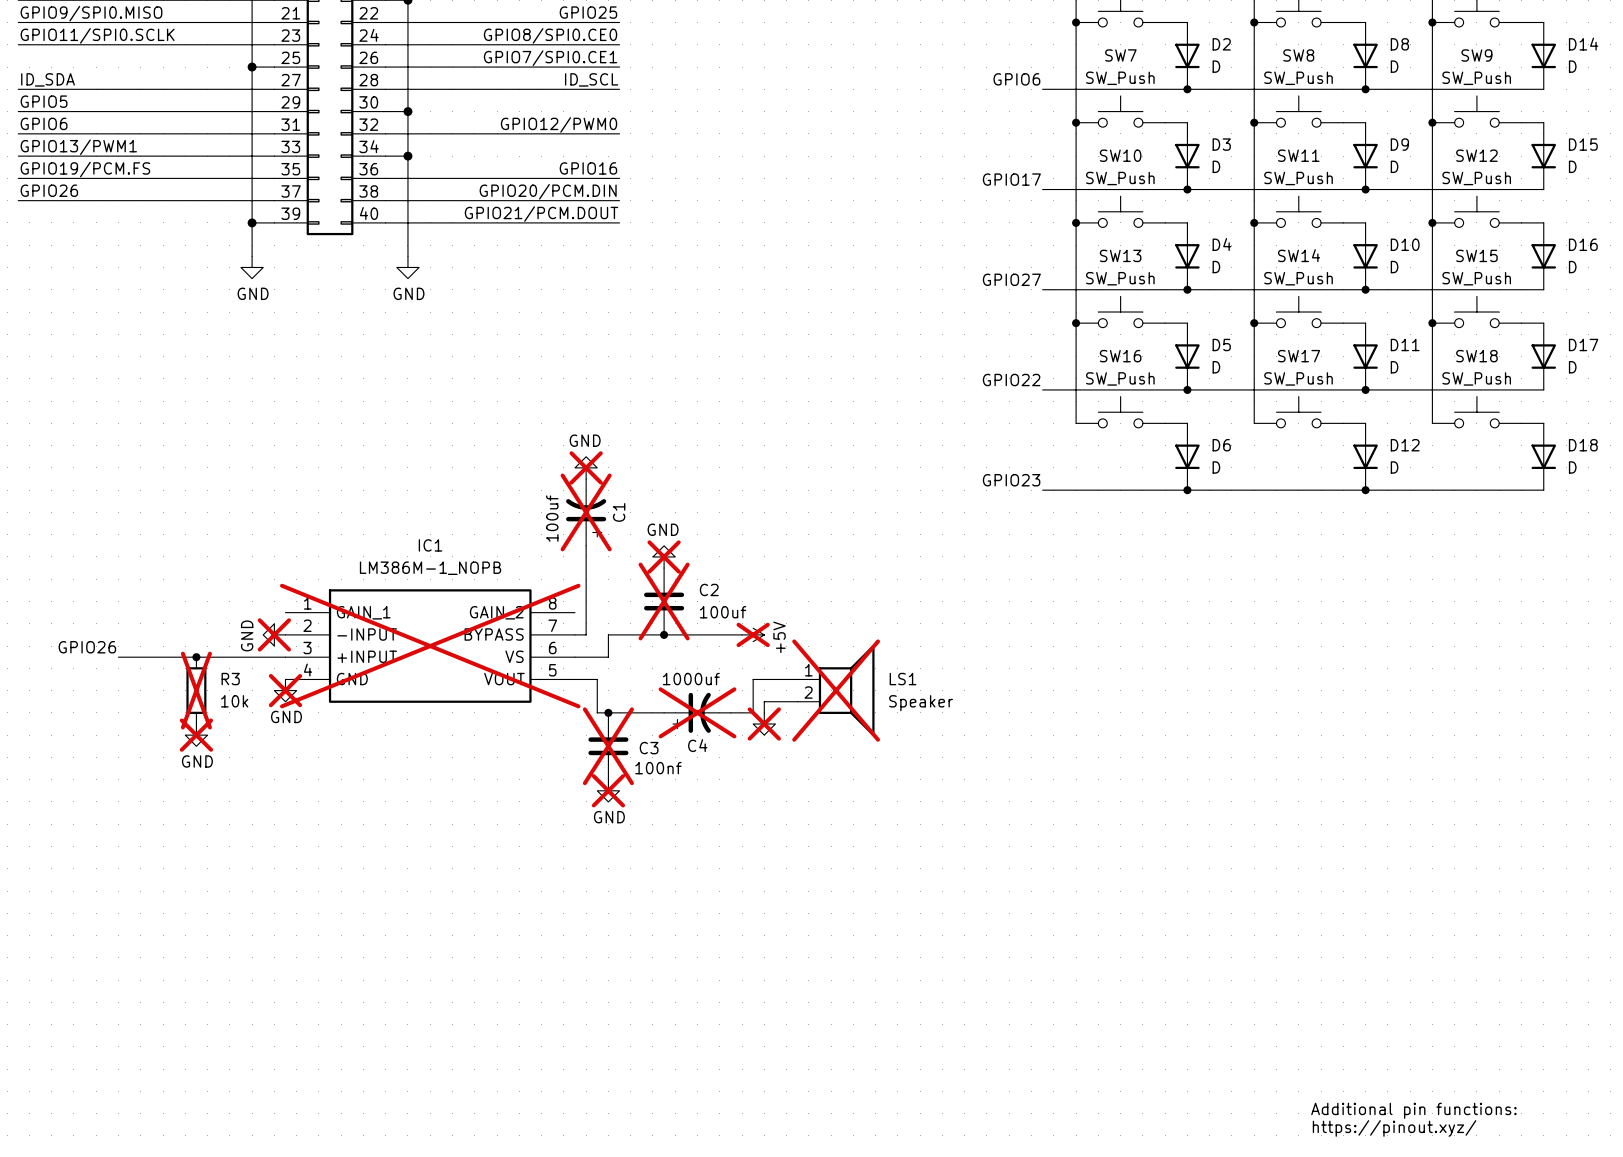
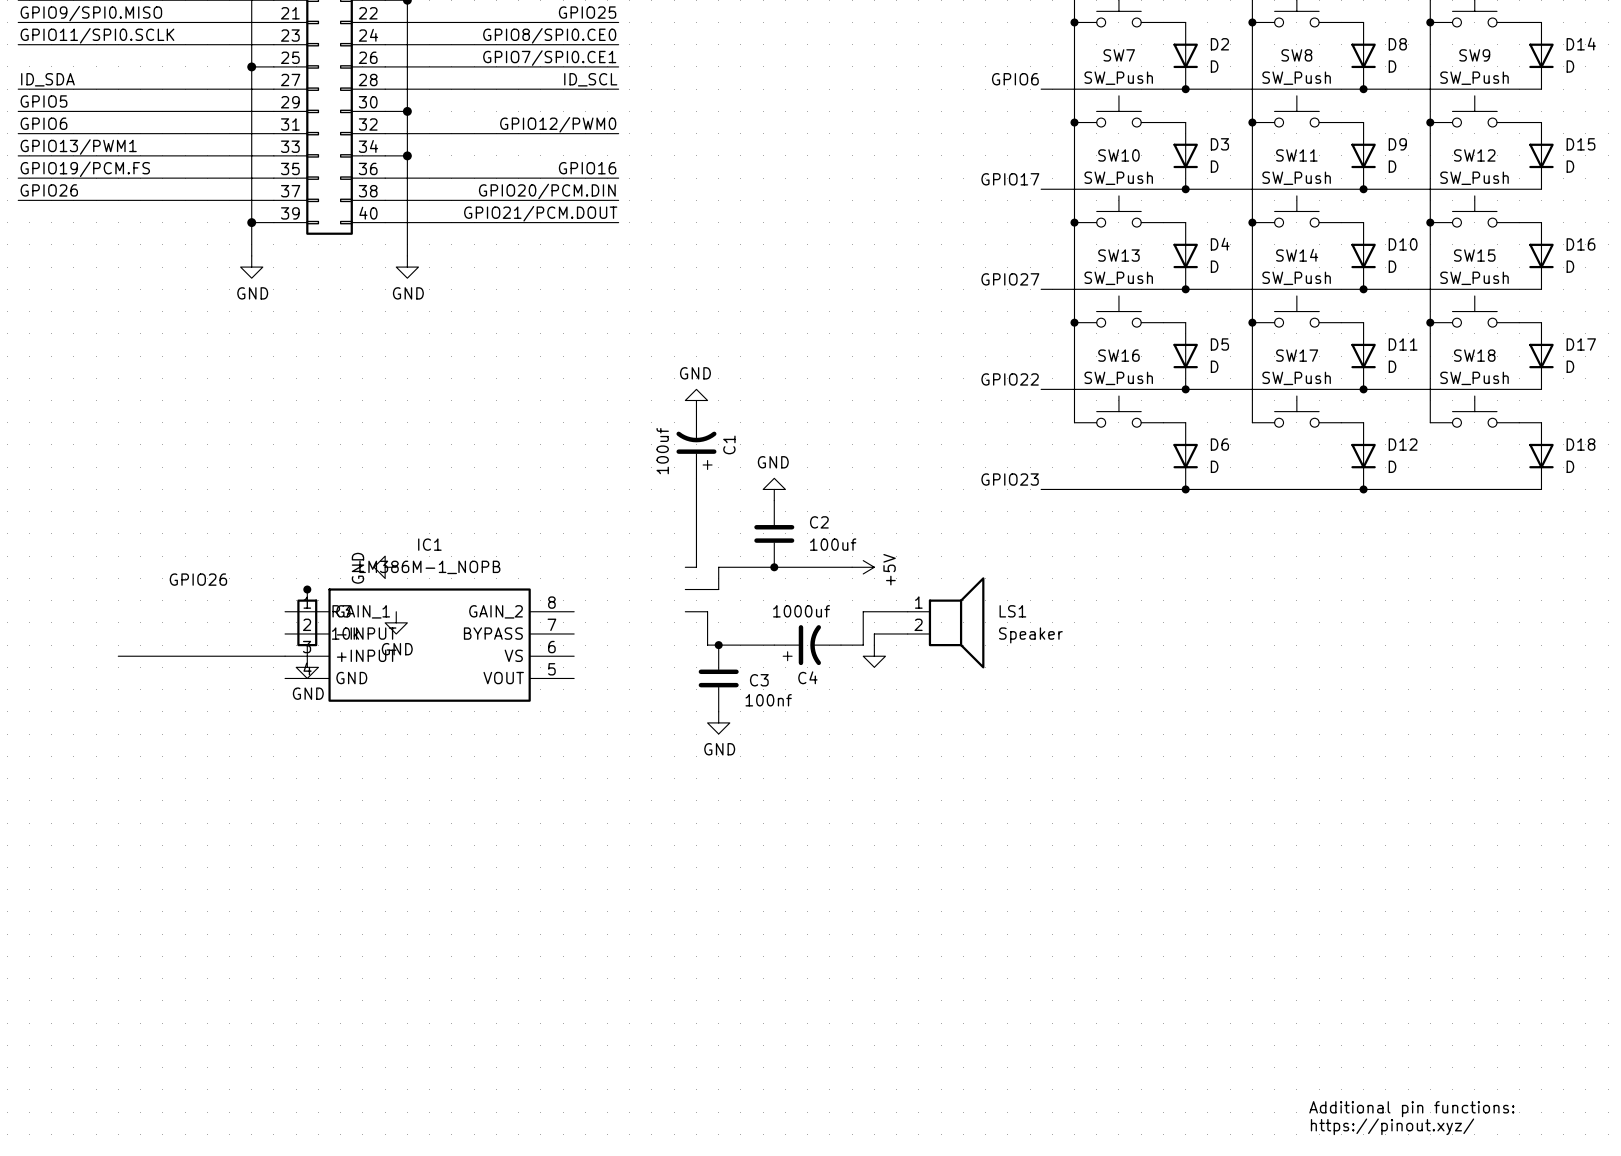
power symbol: none -> GND (696, 400)
power symbol: GND (586, 467) -> none
power symbol: none -> GND (774, 489)
C1 position: (586, 512) -> (696, 444)
C1 do-not-place cross: (586, 512) -> none
wire: (586, 545) (586, 634) (575, 634) -> (696, 478) (696, 567) (685, 567)
power symbol: GND (664, 556) -> none
power symbol: none -> GND (385, 567)
junction: none -> (774, 567)
junction: none -> (307, 589)
C2 position: (664, 601) -> (774, 533)
C2 do-not-place cross: (664, 601) -> none
power symbol: none -> GND (396, 622)
power symbol: GND (274, 634) -> none
junction: (664, 634) -> none
wire: (742, 634) (608, 634) (608, 657) (575, 657) -> (852, 567) (718, 567) (718, 589) (685, 589)
power symbol position: +5V (753, 634) -> +5V (863, 567)
power symbol do-not-place cross: (753, 634) -> none
IC1 do-not-place cross: (430, 646) -> none
junction: none -> (718, 645)
label position: GPIO26 (87, 647) -> GPIO26 (198, 579)
junction: (196, 657) -> none
power symbol: none -> GND (307, 667)
wire: (575, 679) (597, 679) (597, 712) (664, 712) -> (685, 611) (707, 611) (707, 645) (774, 645)
wire: (797, 679) (753, 679) (753, 712) (730, 712) -> (907, 611) (863, 611) (863, 645) (841, 645)
R3 position: (196, 690) -> (307, 622)
R3 do-not-place cross: (196, 690) -> none
power symbol: GND (285, 690) -> none
LS1 position: (836, 690) -> (946, 622)
LS1 do-not-place cross: (836, 690) -> none
wire: (797, 701) (764, 701) (764, 712) -> (907, 633) (874, 633) (874, 645)
junction: (608, 712) -> none
C4 position: (697, 712) -> (807, 645)
C4 do-not-place cross: (697, 712) -> none
power symbol: none -> GND (718, 722)
power symbol position: (764, 724) -> (874, 656)
power symbol do-not-place cross: (764, 724) -> none
power symbol: GND (196, 735) -> none
C3 position: (608, 746) -> (718, 678)
C3 do-not-place cross: (608, 746) -> none
power symbol: GND (608, 790) -> none

